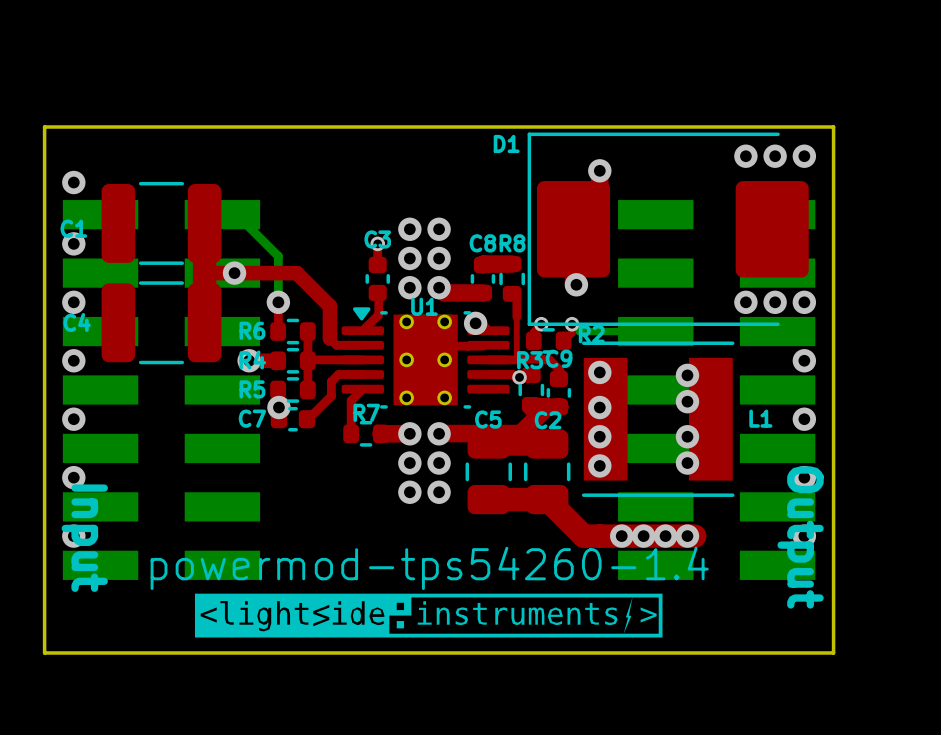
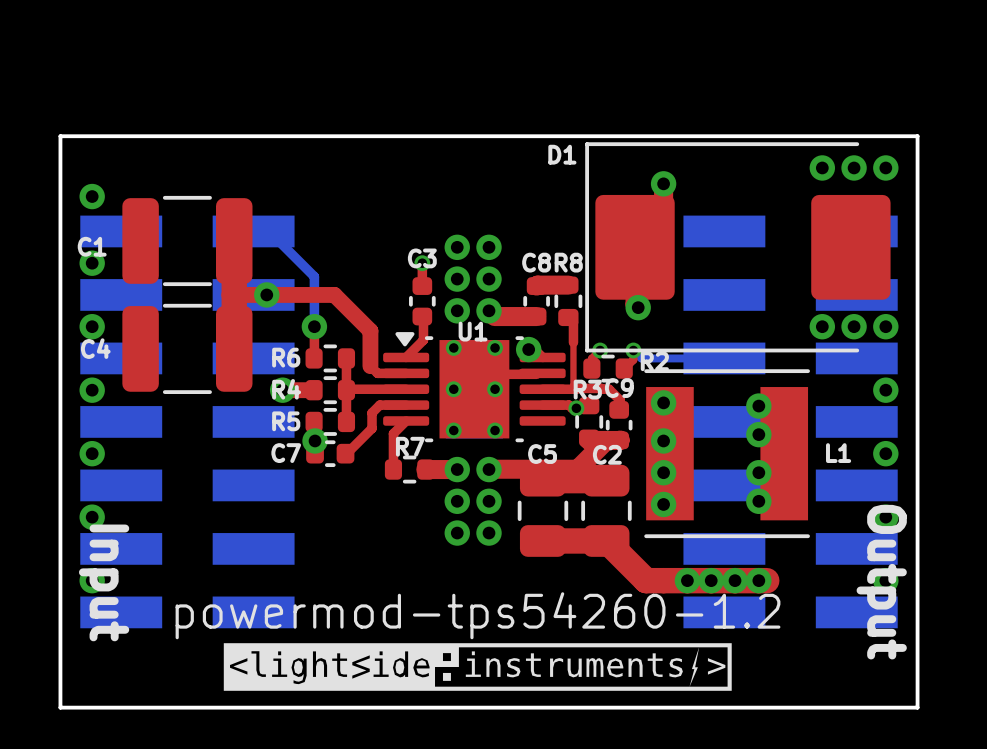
text: powermod-tps54260-1.4 (429, 568) -> powermod-tps54260-1.2 (478, 615)

